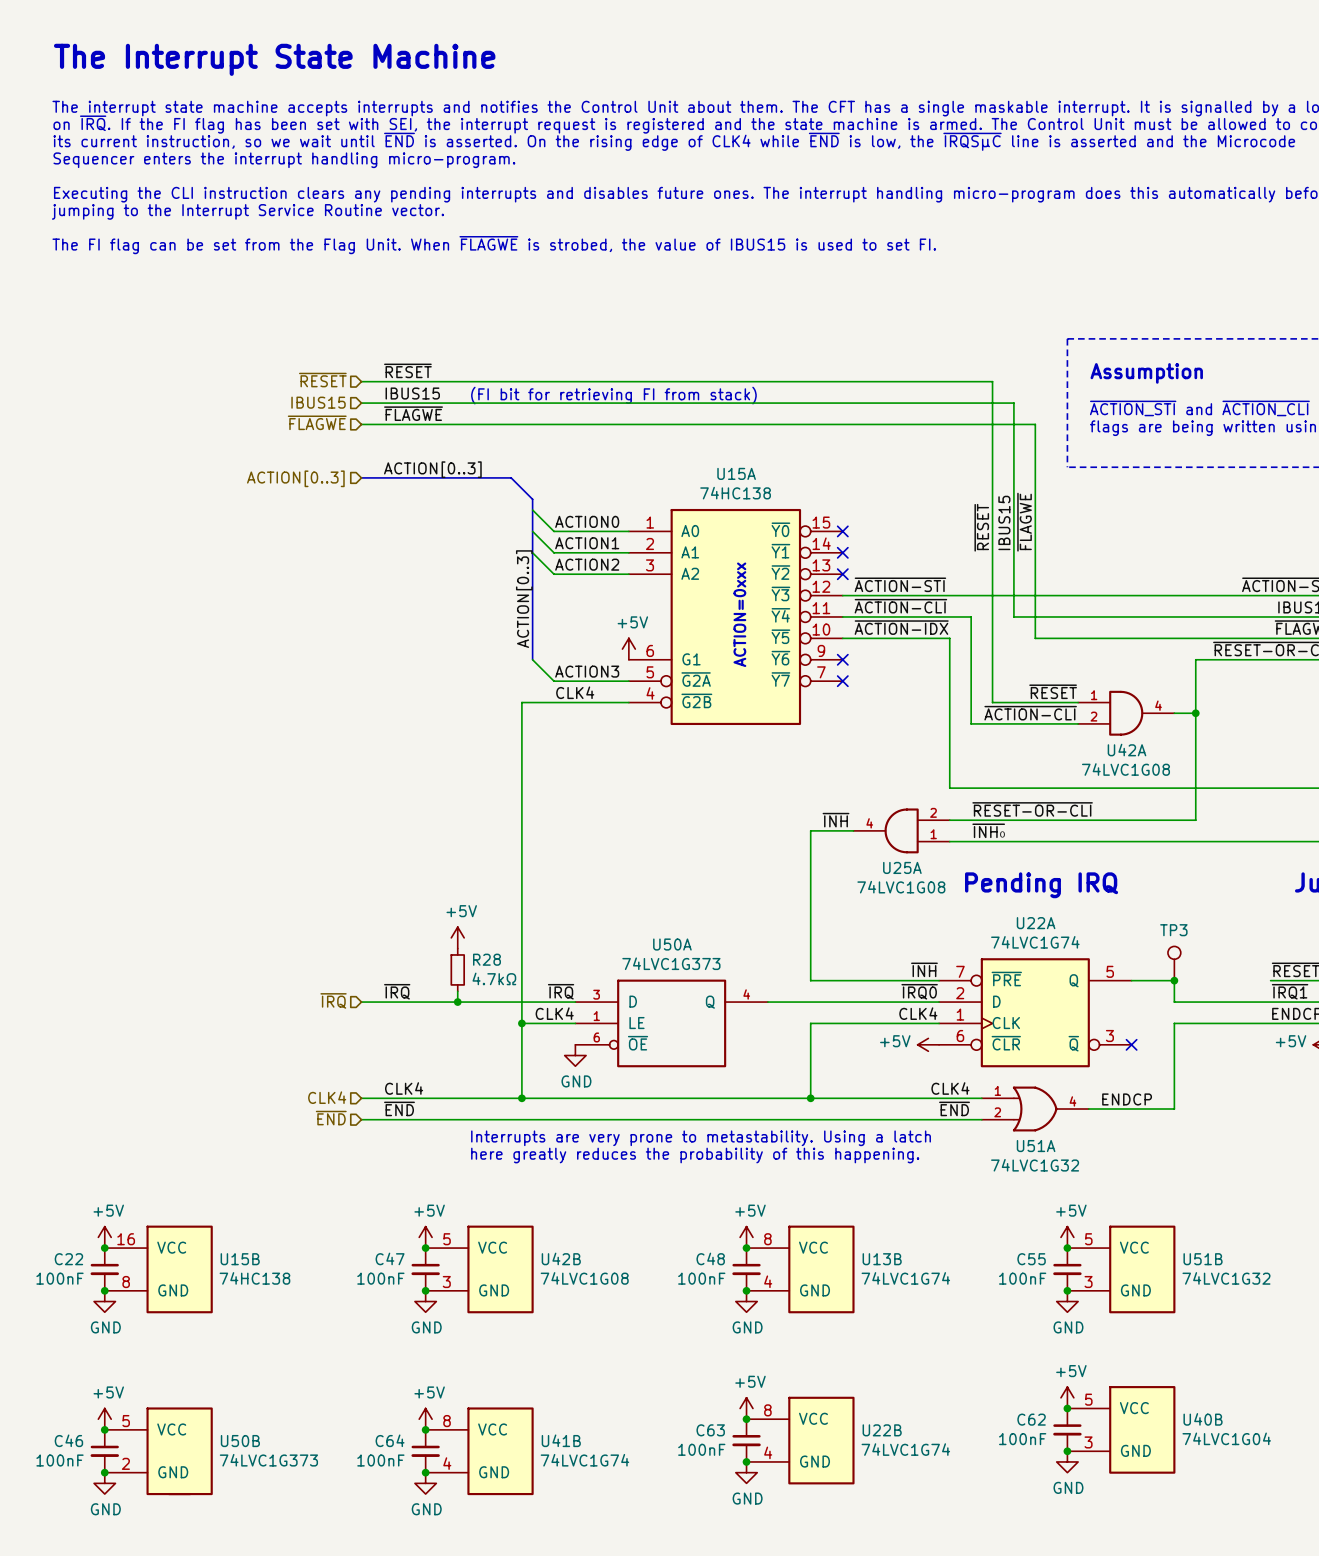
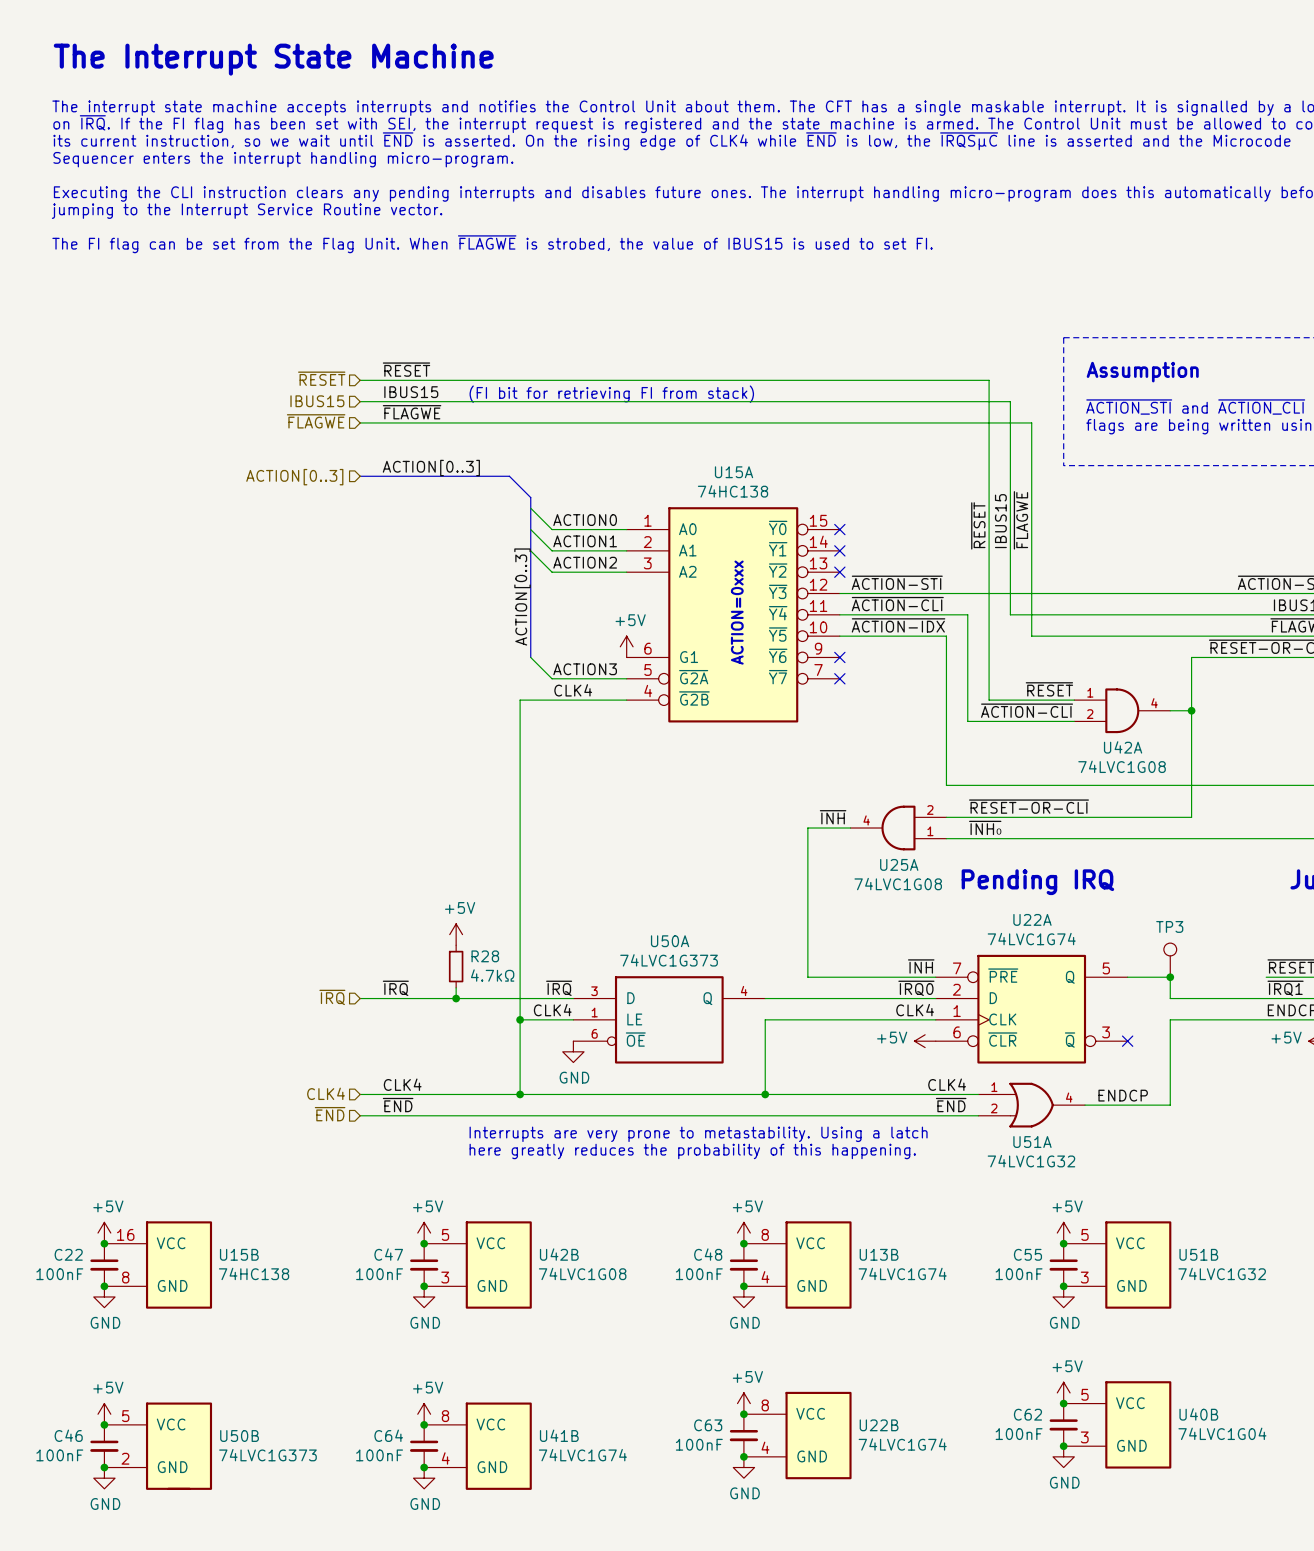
wire: (810, 1023) (810, 1098) -> (807, 1019) (765, 1019) (765, 1094)
junction position: (810, 1098) -> (765, 1094)

